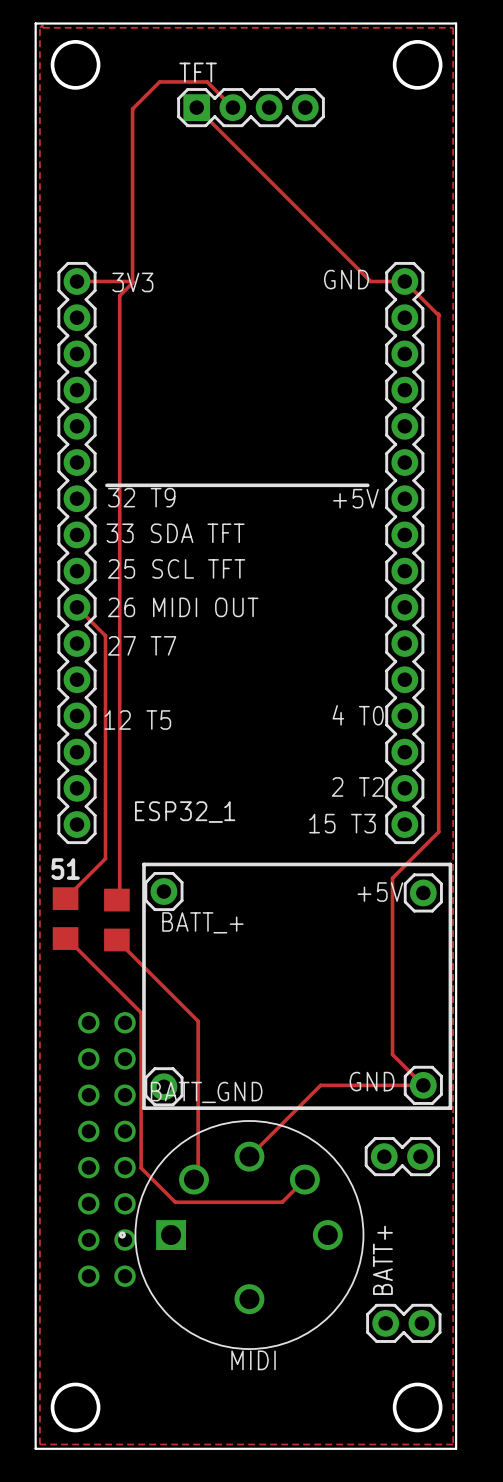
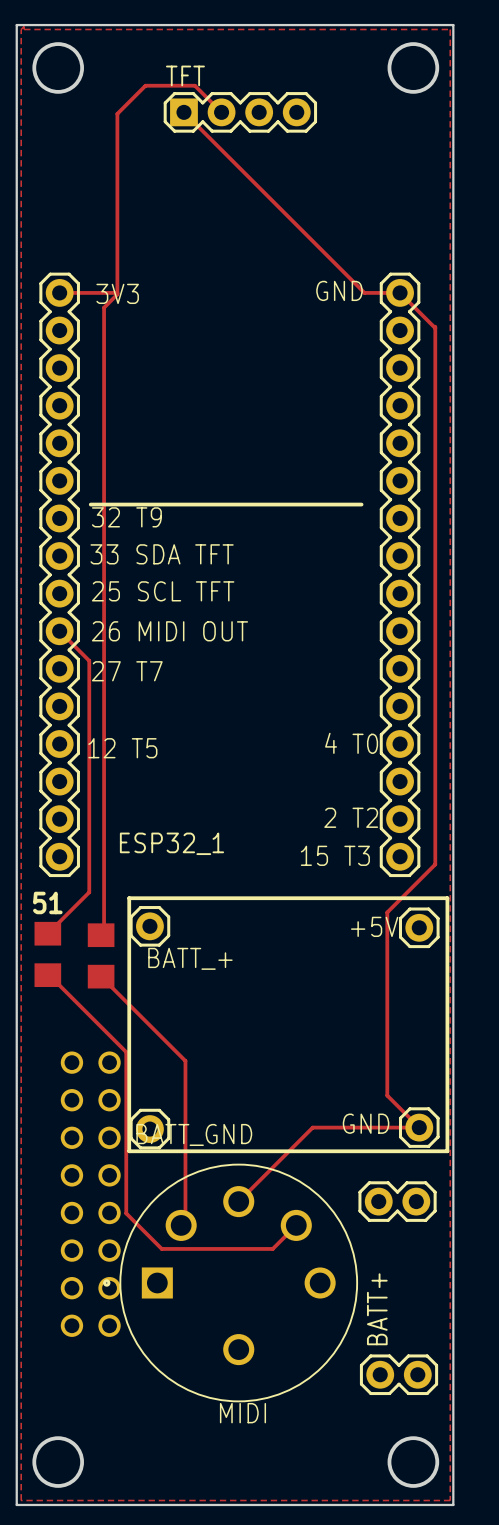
text: +5V (355, 498) -> none

